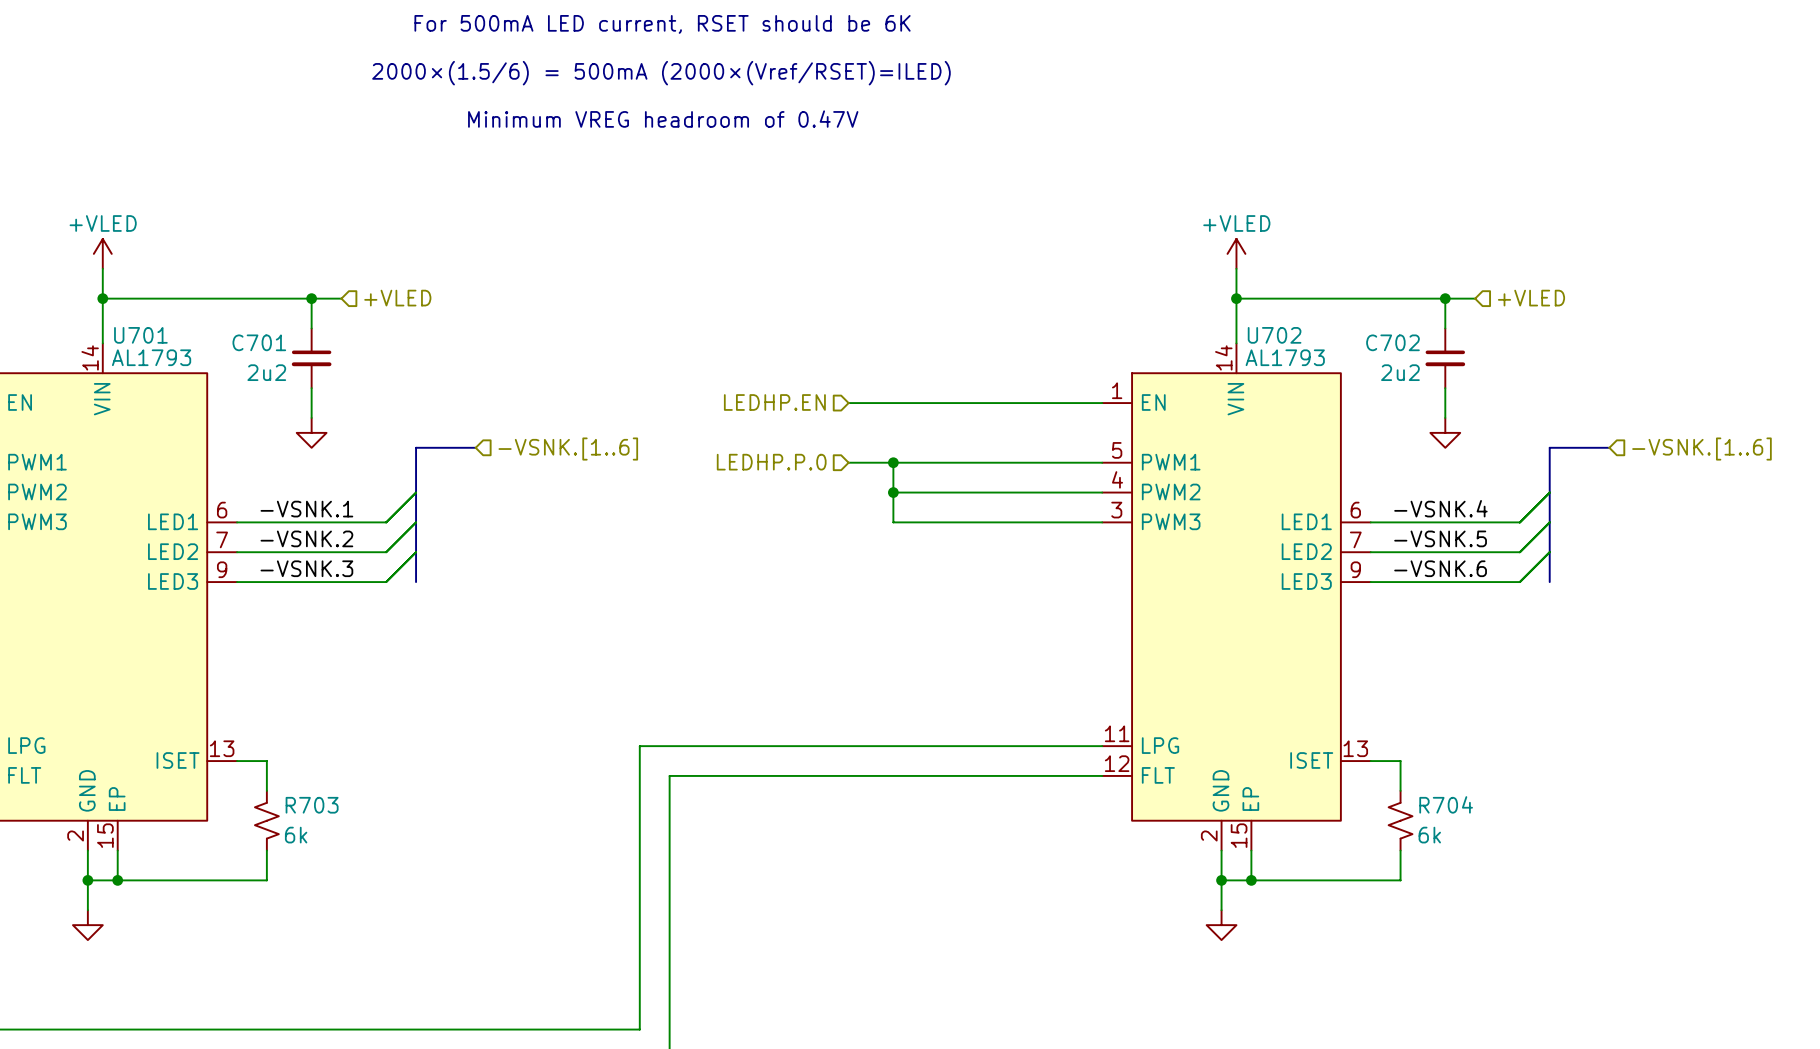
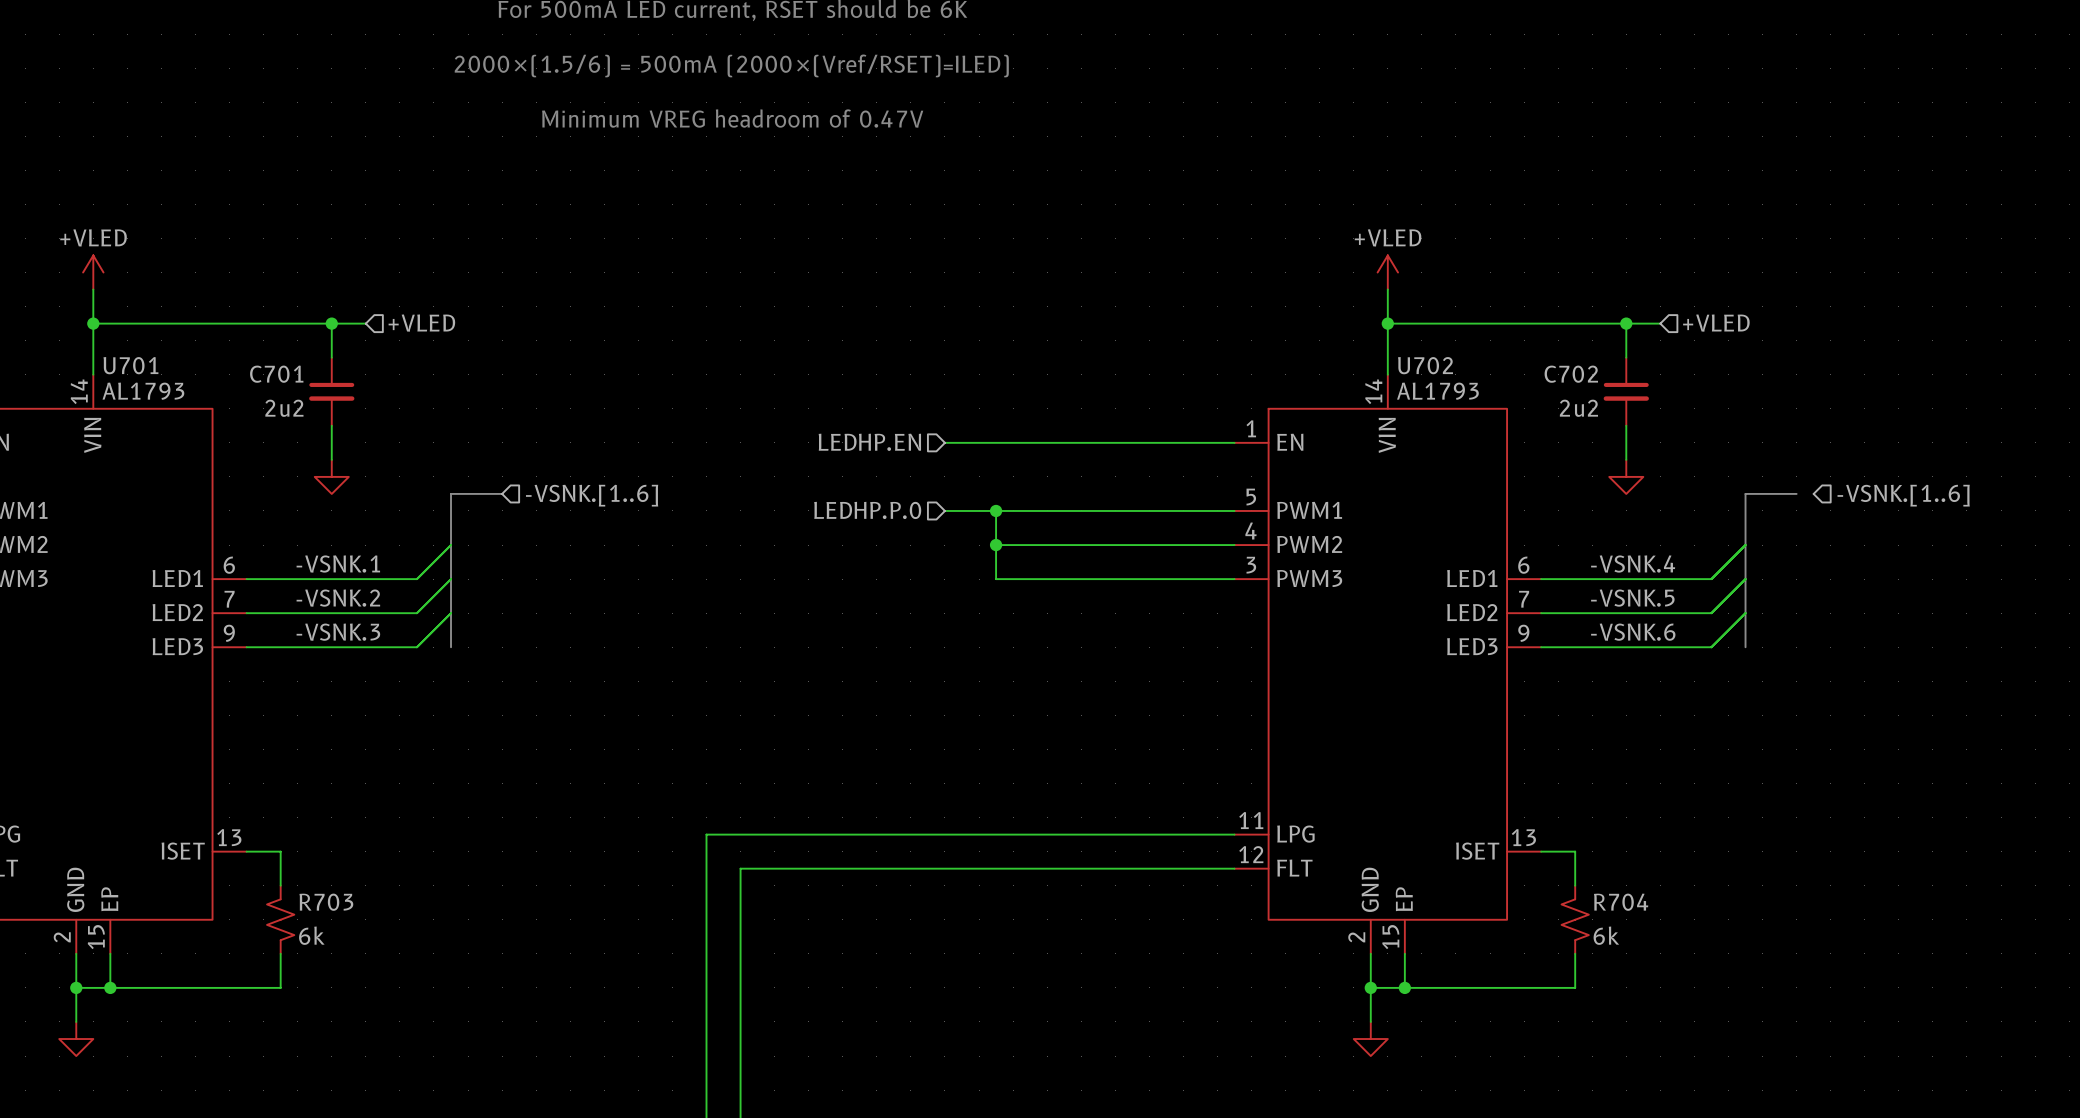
bus: (460, 447) (475, 447) -> none
bus: (1594, 447) (1609, 447) -> none
hierarchical label position: -VSNK.[1..6] (568, 449) -> -VSNK.[1..6] (592, 495)

